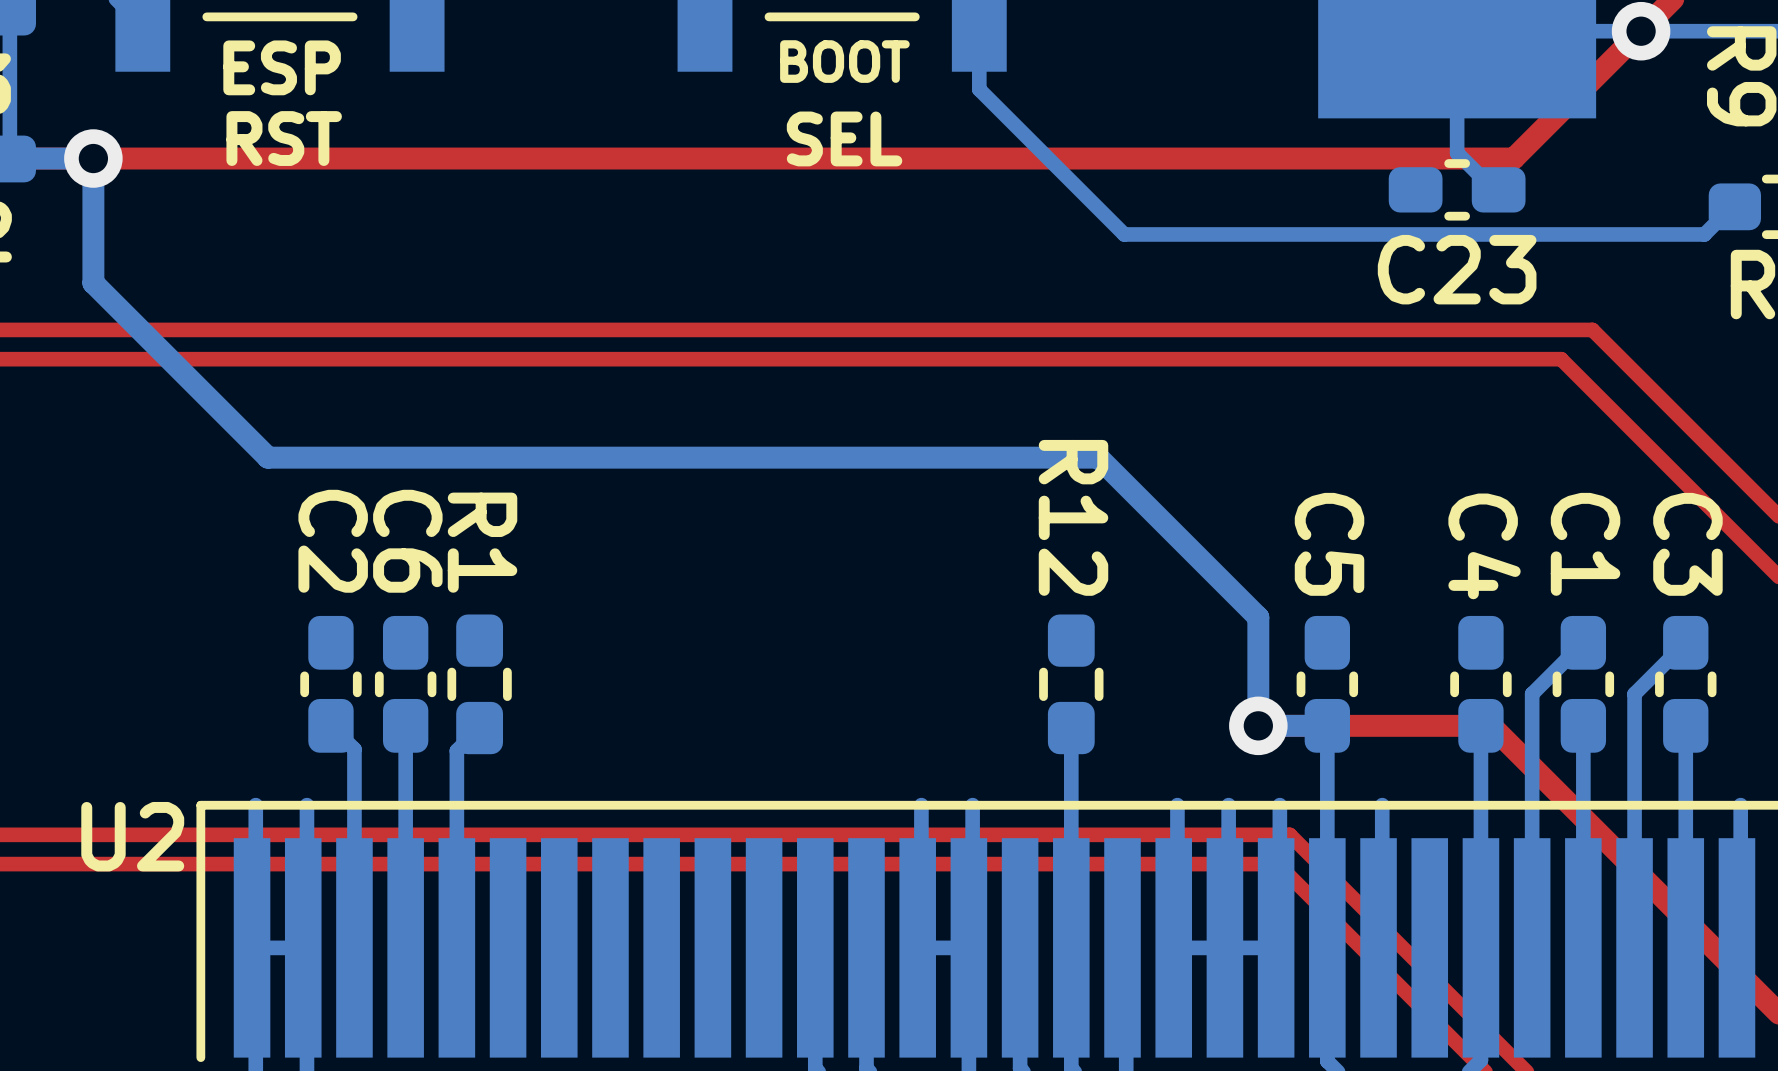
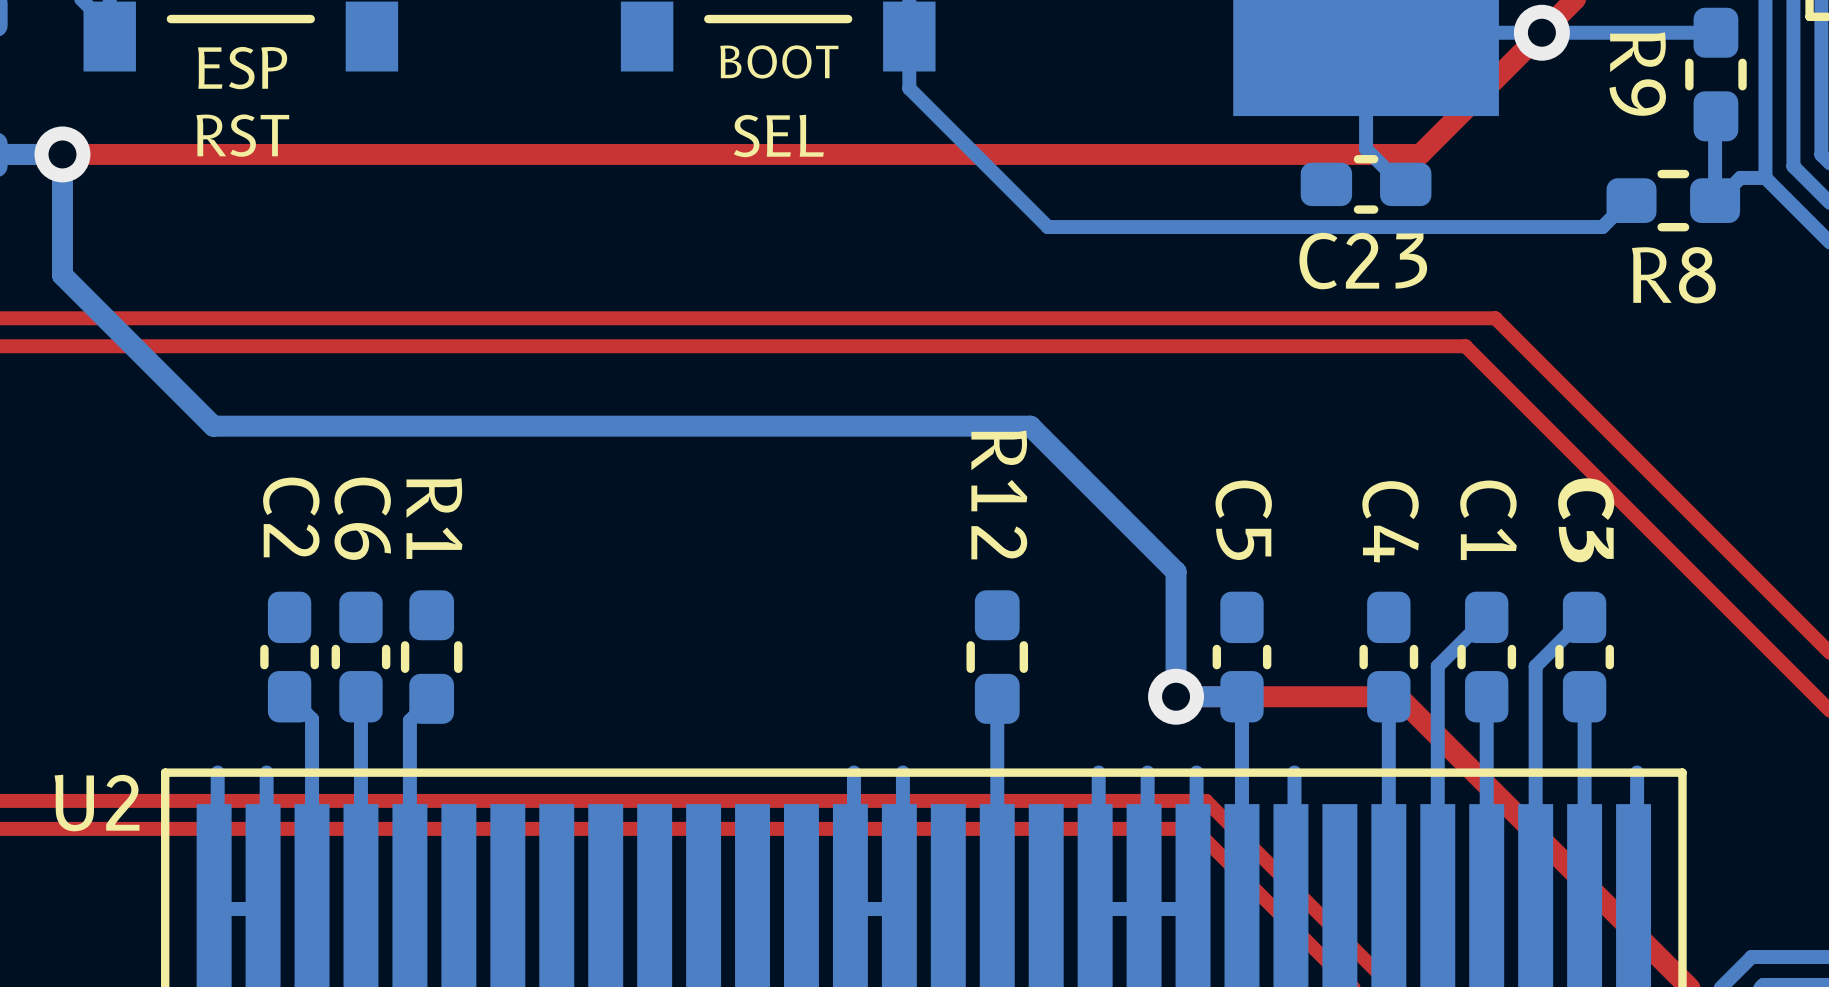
bottom track: (93, 283) (268, 457) (1098, 457) (1258, 617) -> (62, 273) (213, 426) (1030, 426) (1176, 571) (1176, 593)

